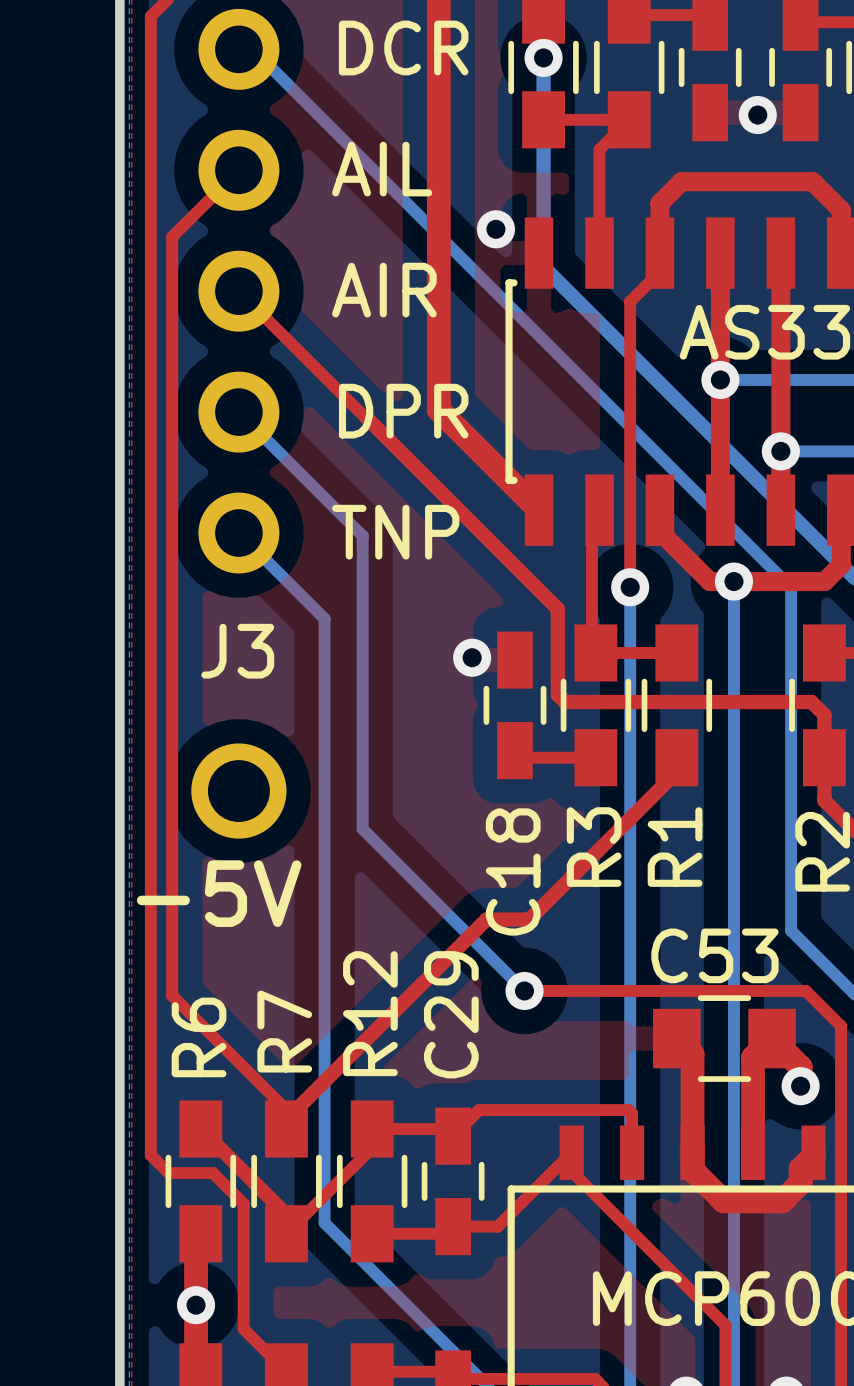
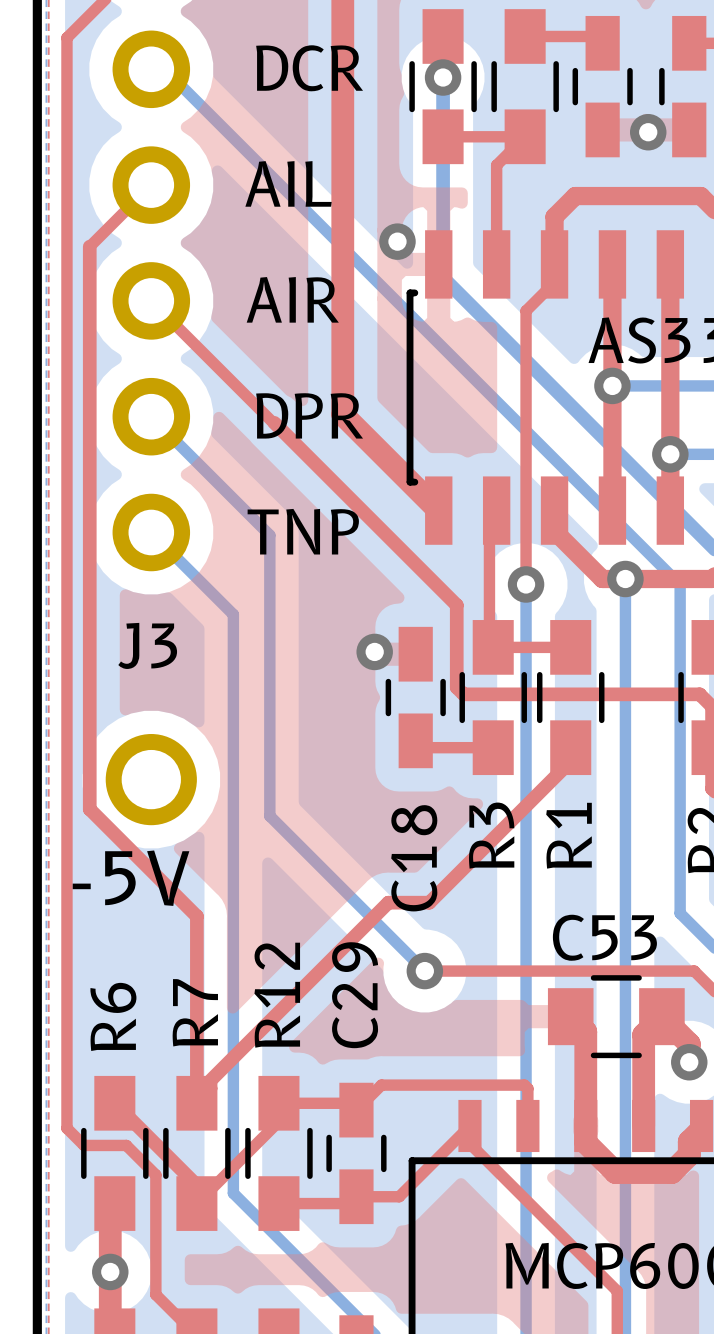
top track: (174, 234) (172, 236) (172, 995) (290, 1113) -> (89, 246) (89, 809) (196, 916) (196, 1094)

